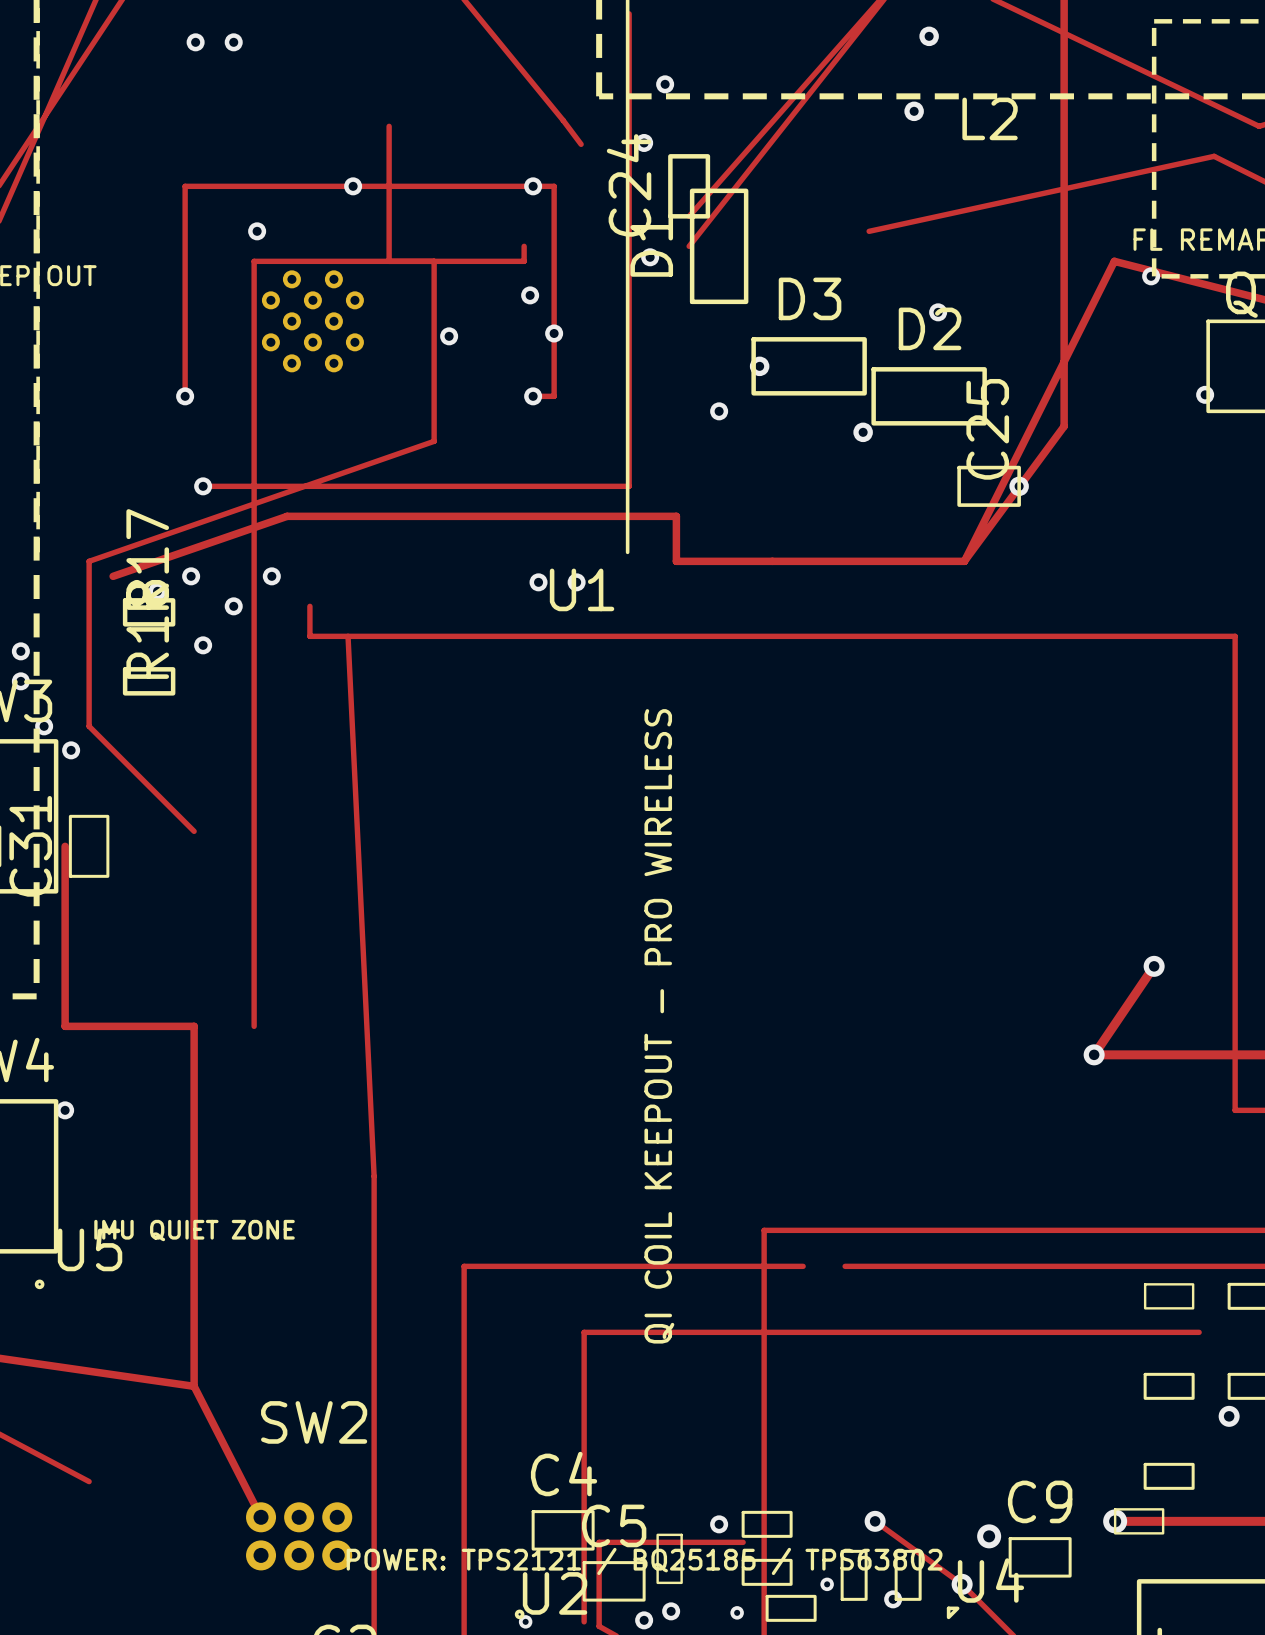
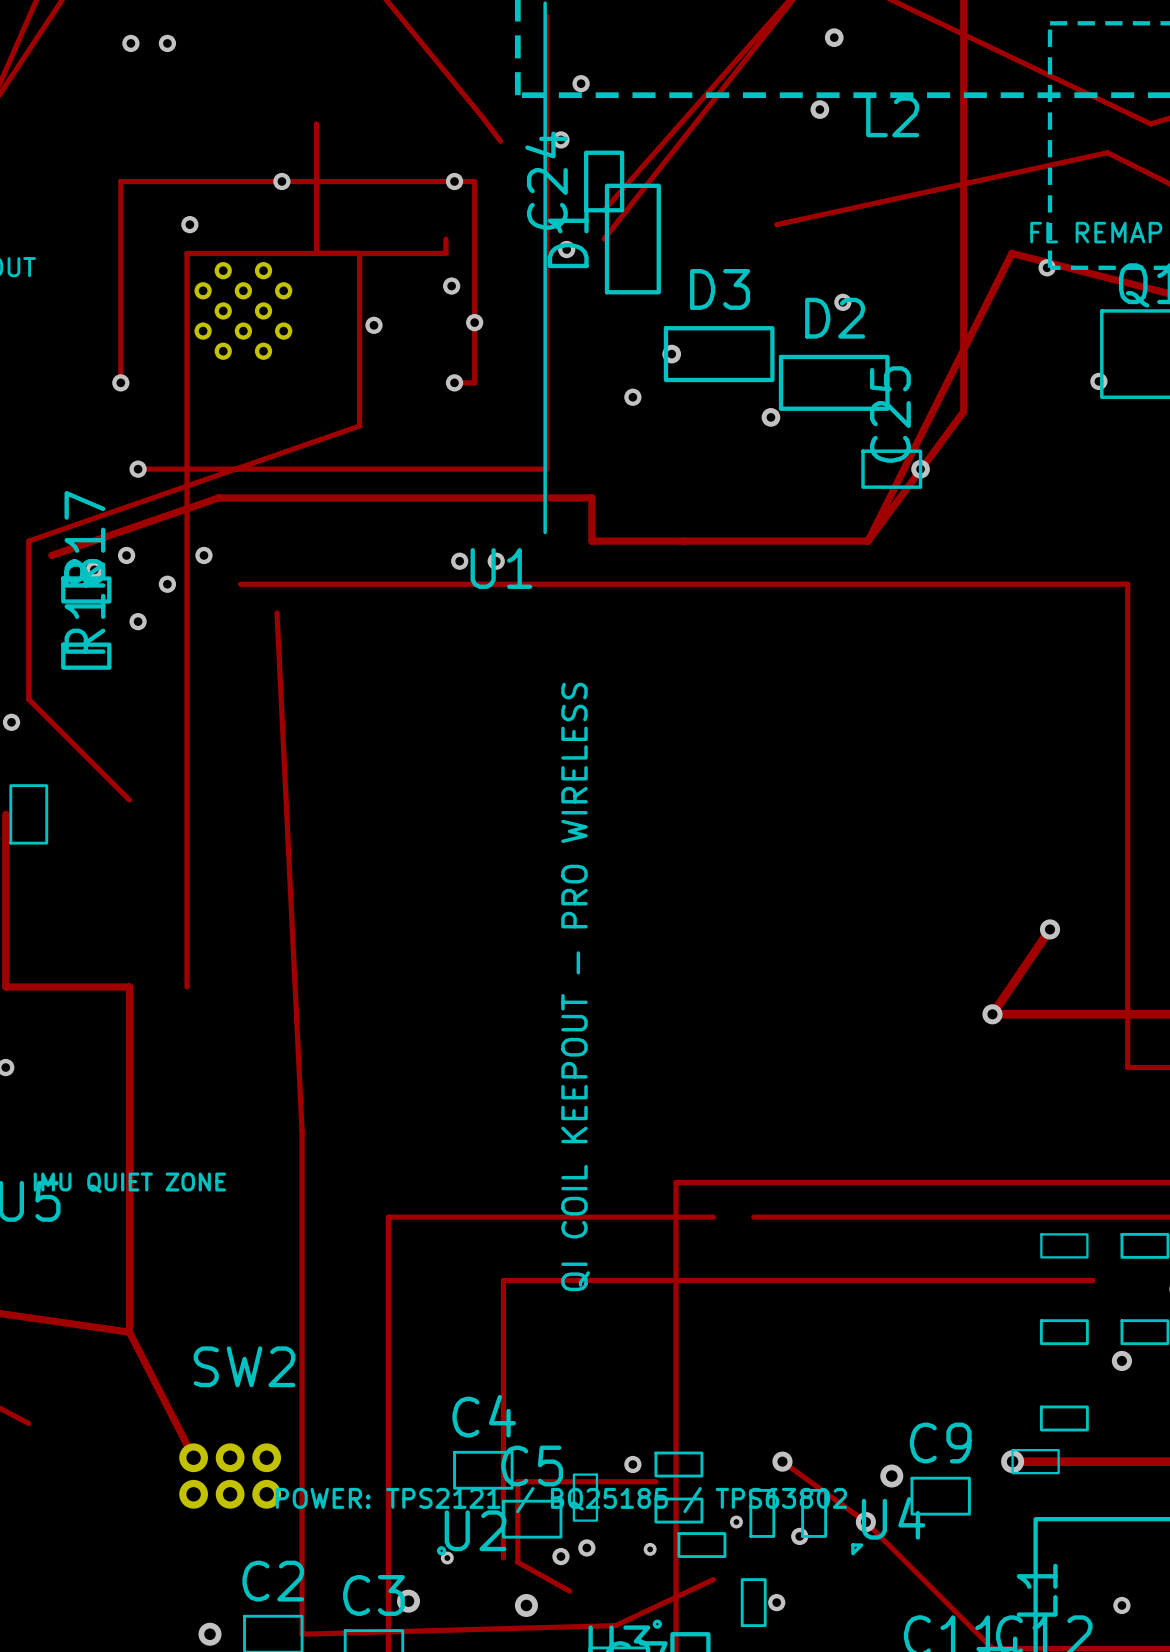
track: (309, 606) (309, 636) (1235, 636) -> (240, 584) (1127, 584) (1127, 613)

